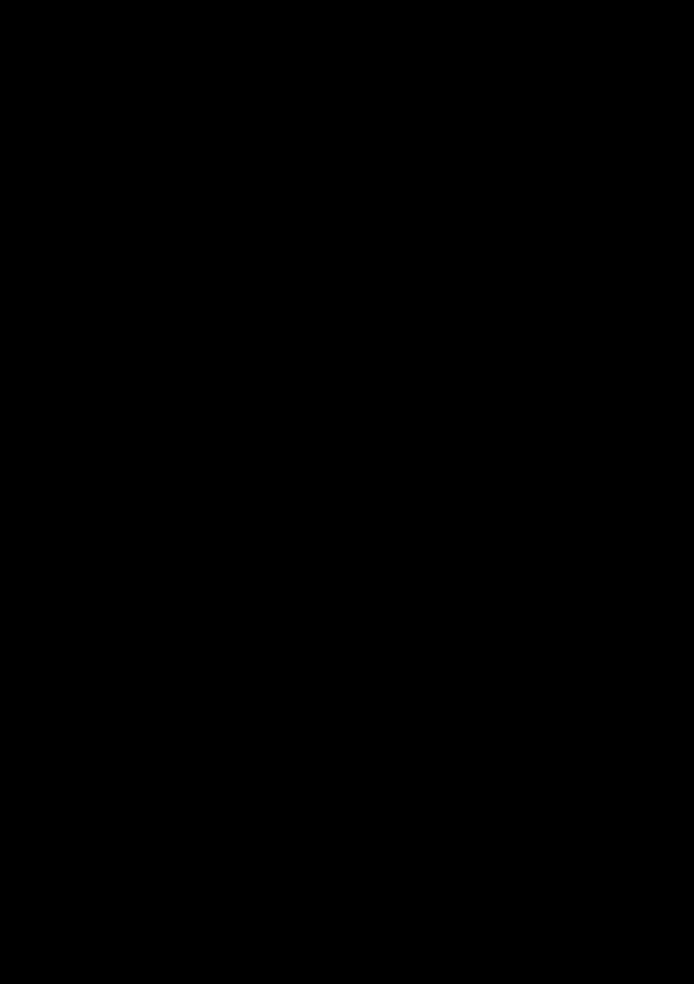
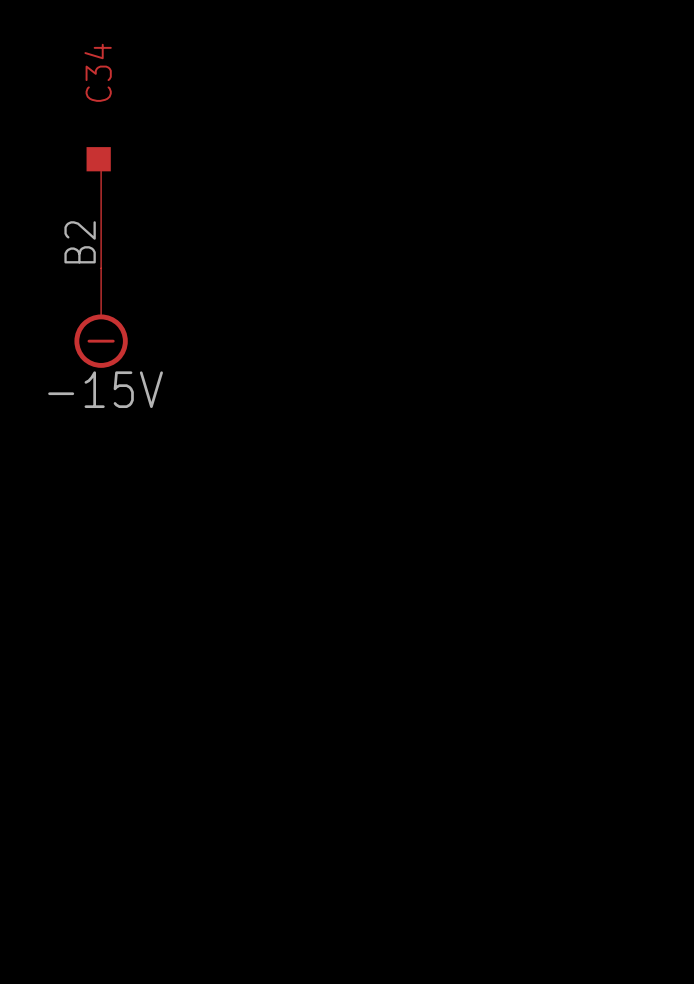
C34: none -> (98, 207)
power symbol: none -> -15V (101, 318)

